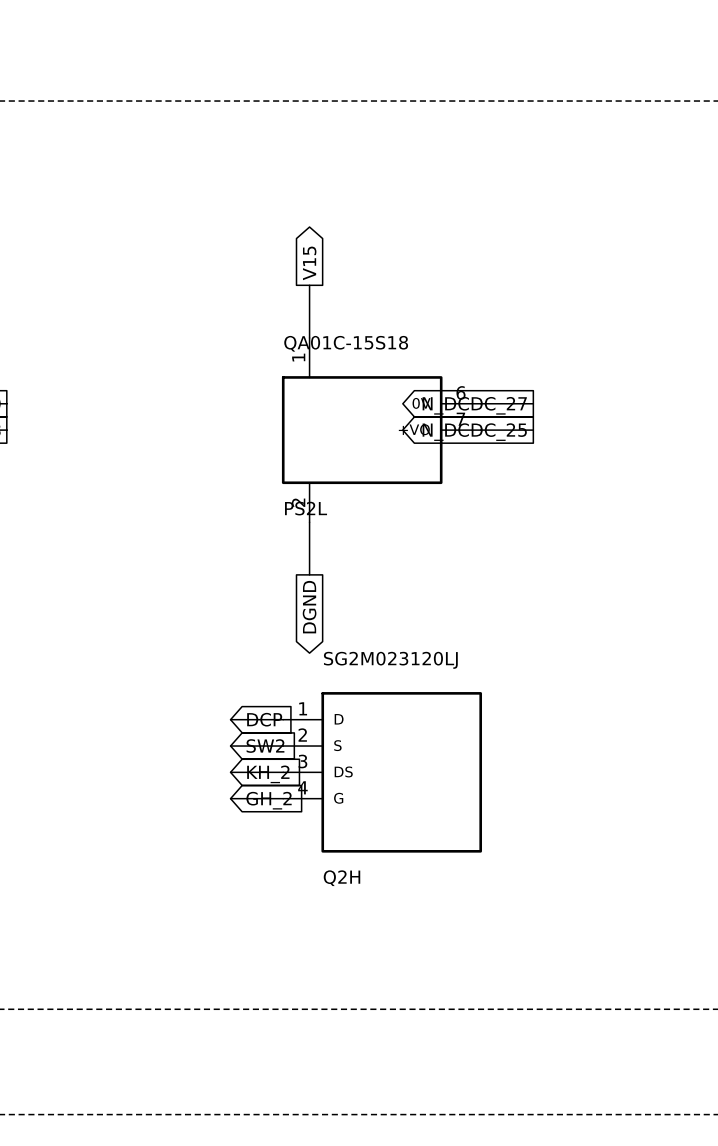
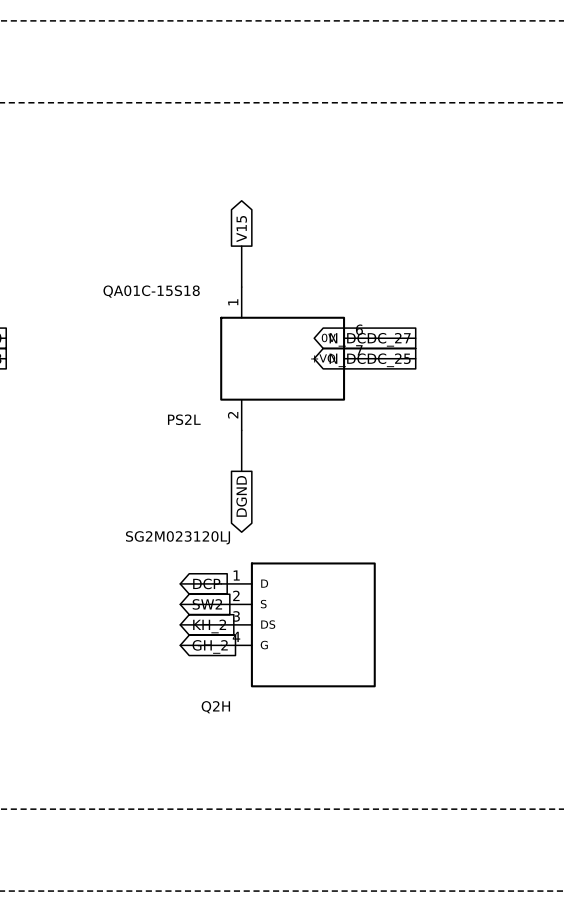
PS2L value position: QA01C-15S18 (346, 343) -> QA01C-15S18 (151, 291)
PS2L name position: PS2L (306, 508) -> PS2L (184, 419)
Q2H value position: SG2M023120LJ (390, 660) -> SG2M023120LJ (178, 537)
Q2H name position: Q2H (341, 878) -> Q2H (215, 707)

